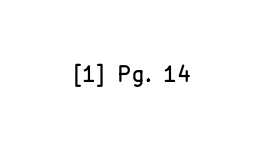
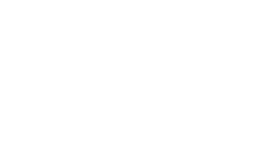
text: [1] Pg. 14 (132, 75) -> none

